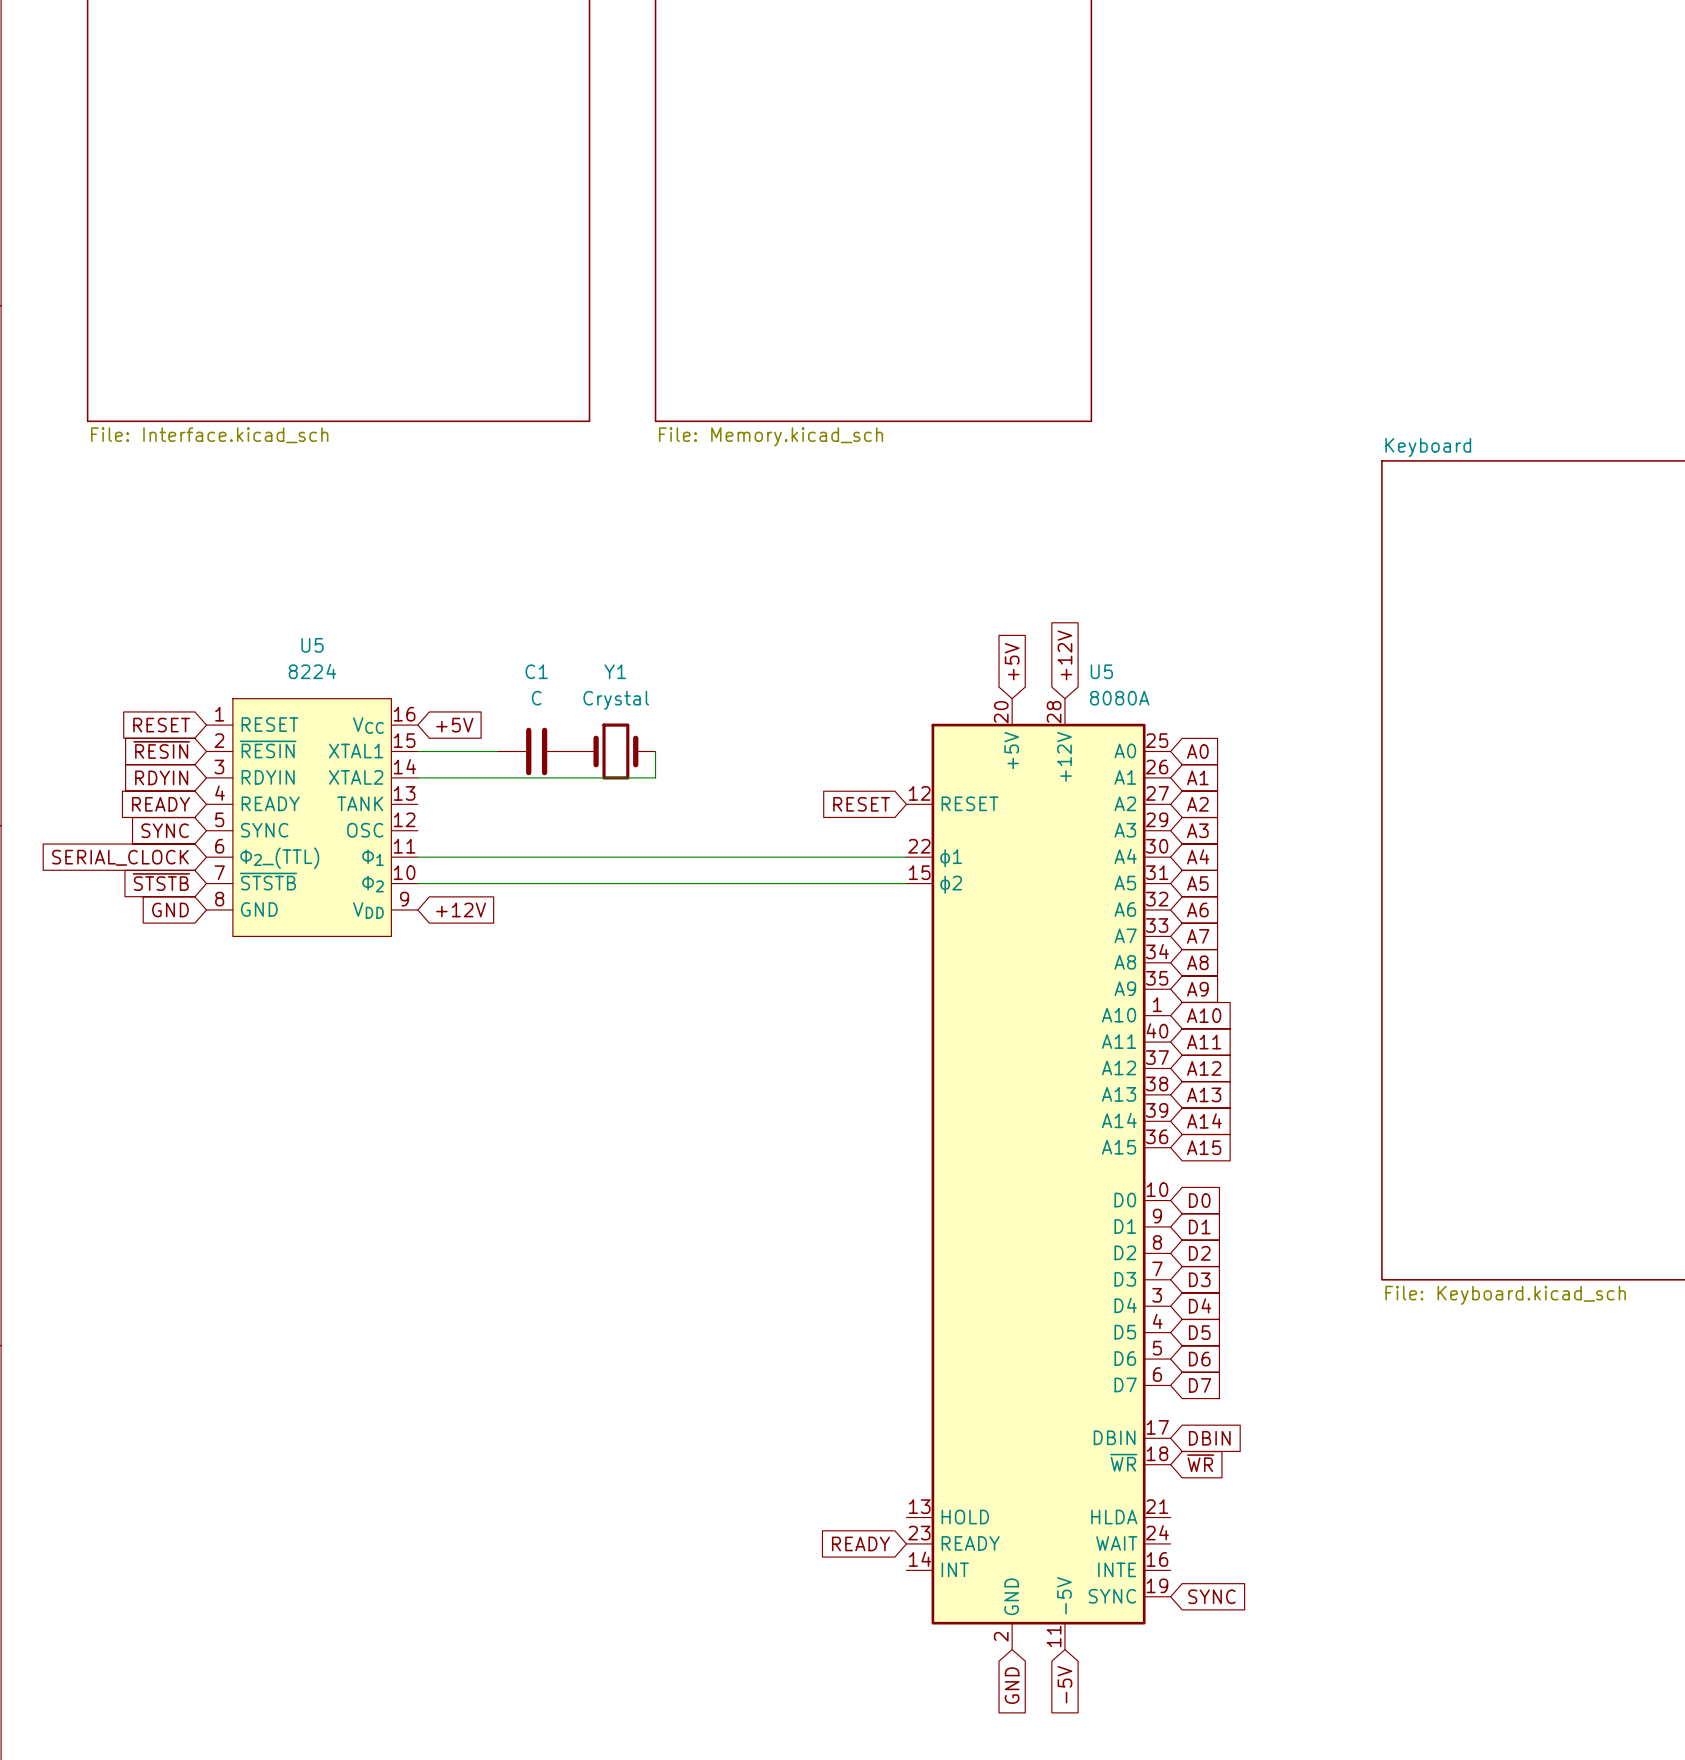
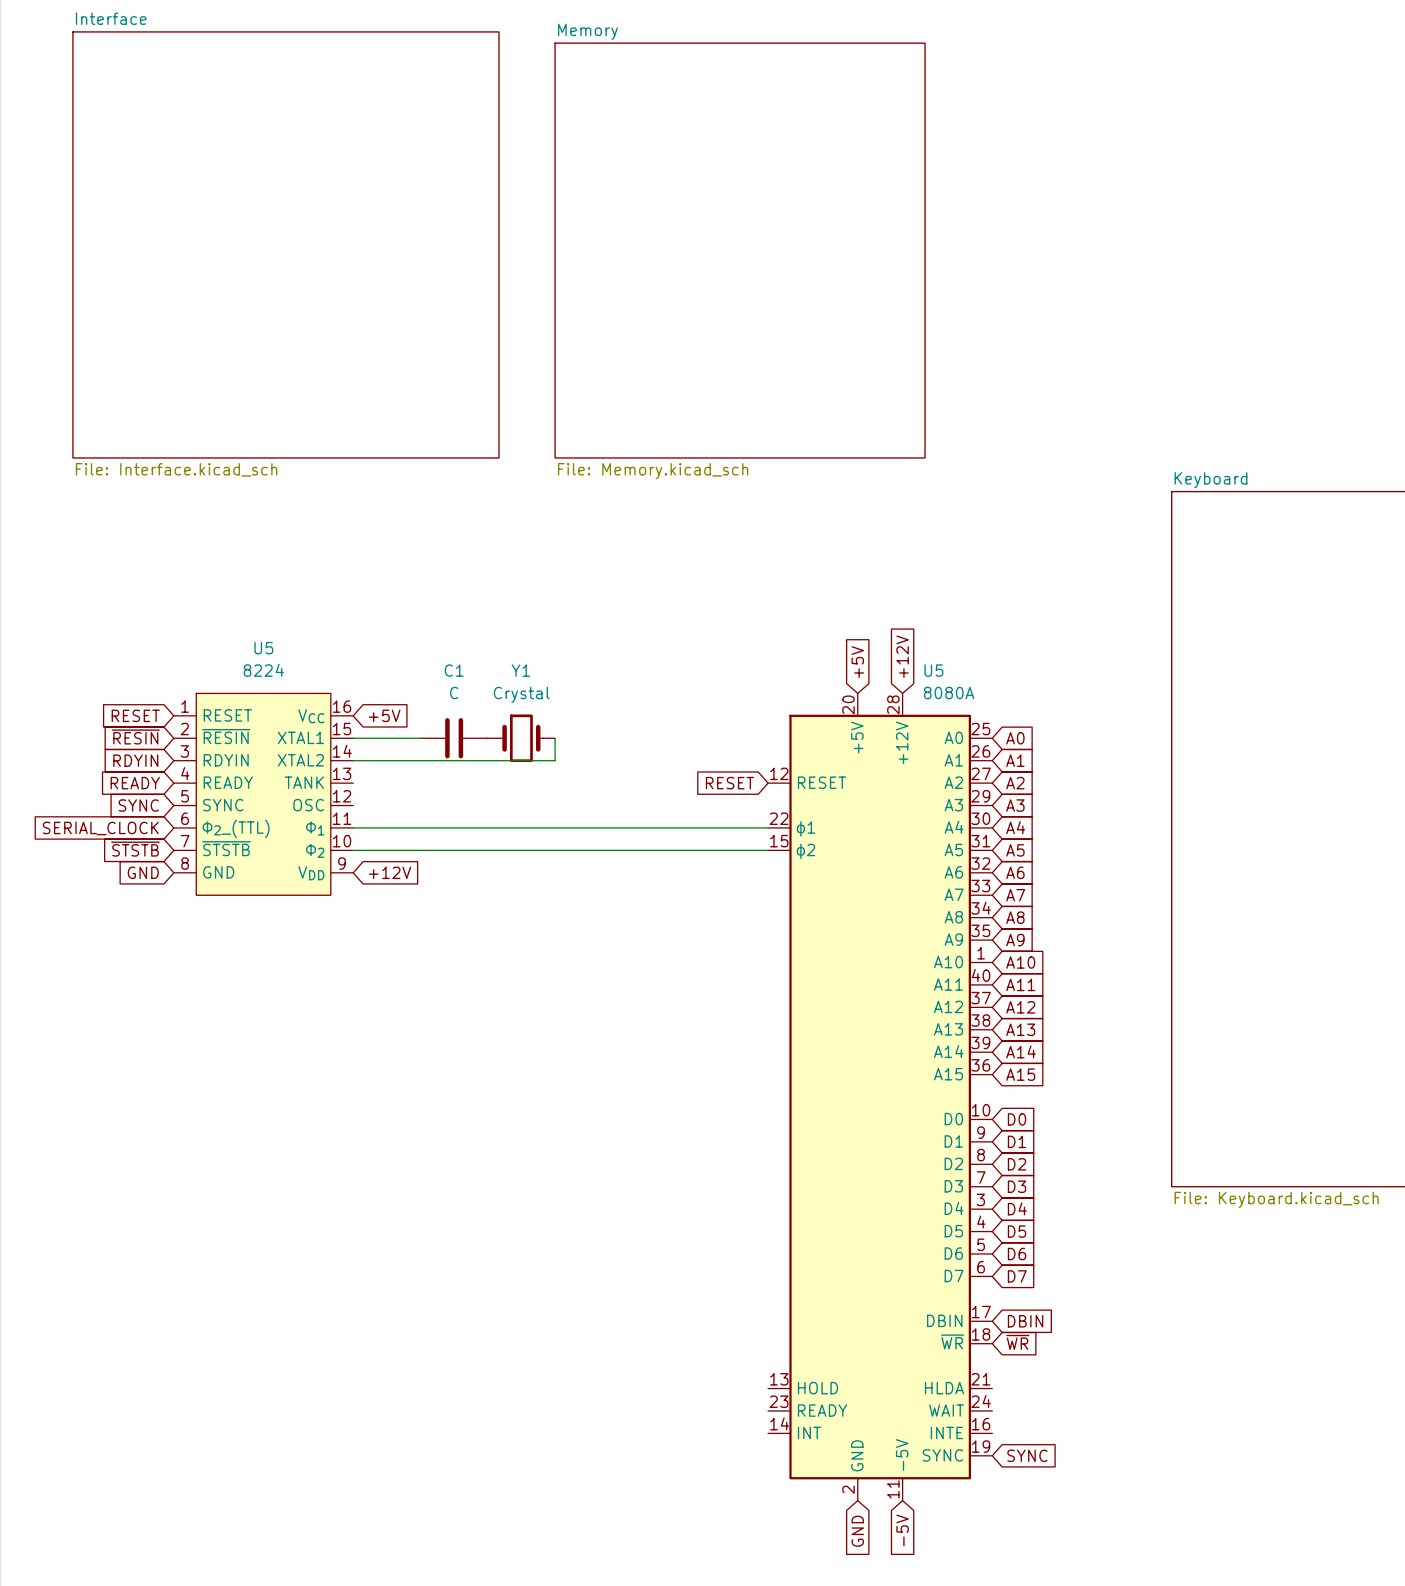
global label: READY (861, 1543) -> none

